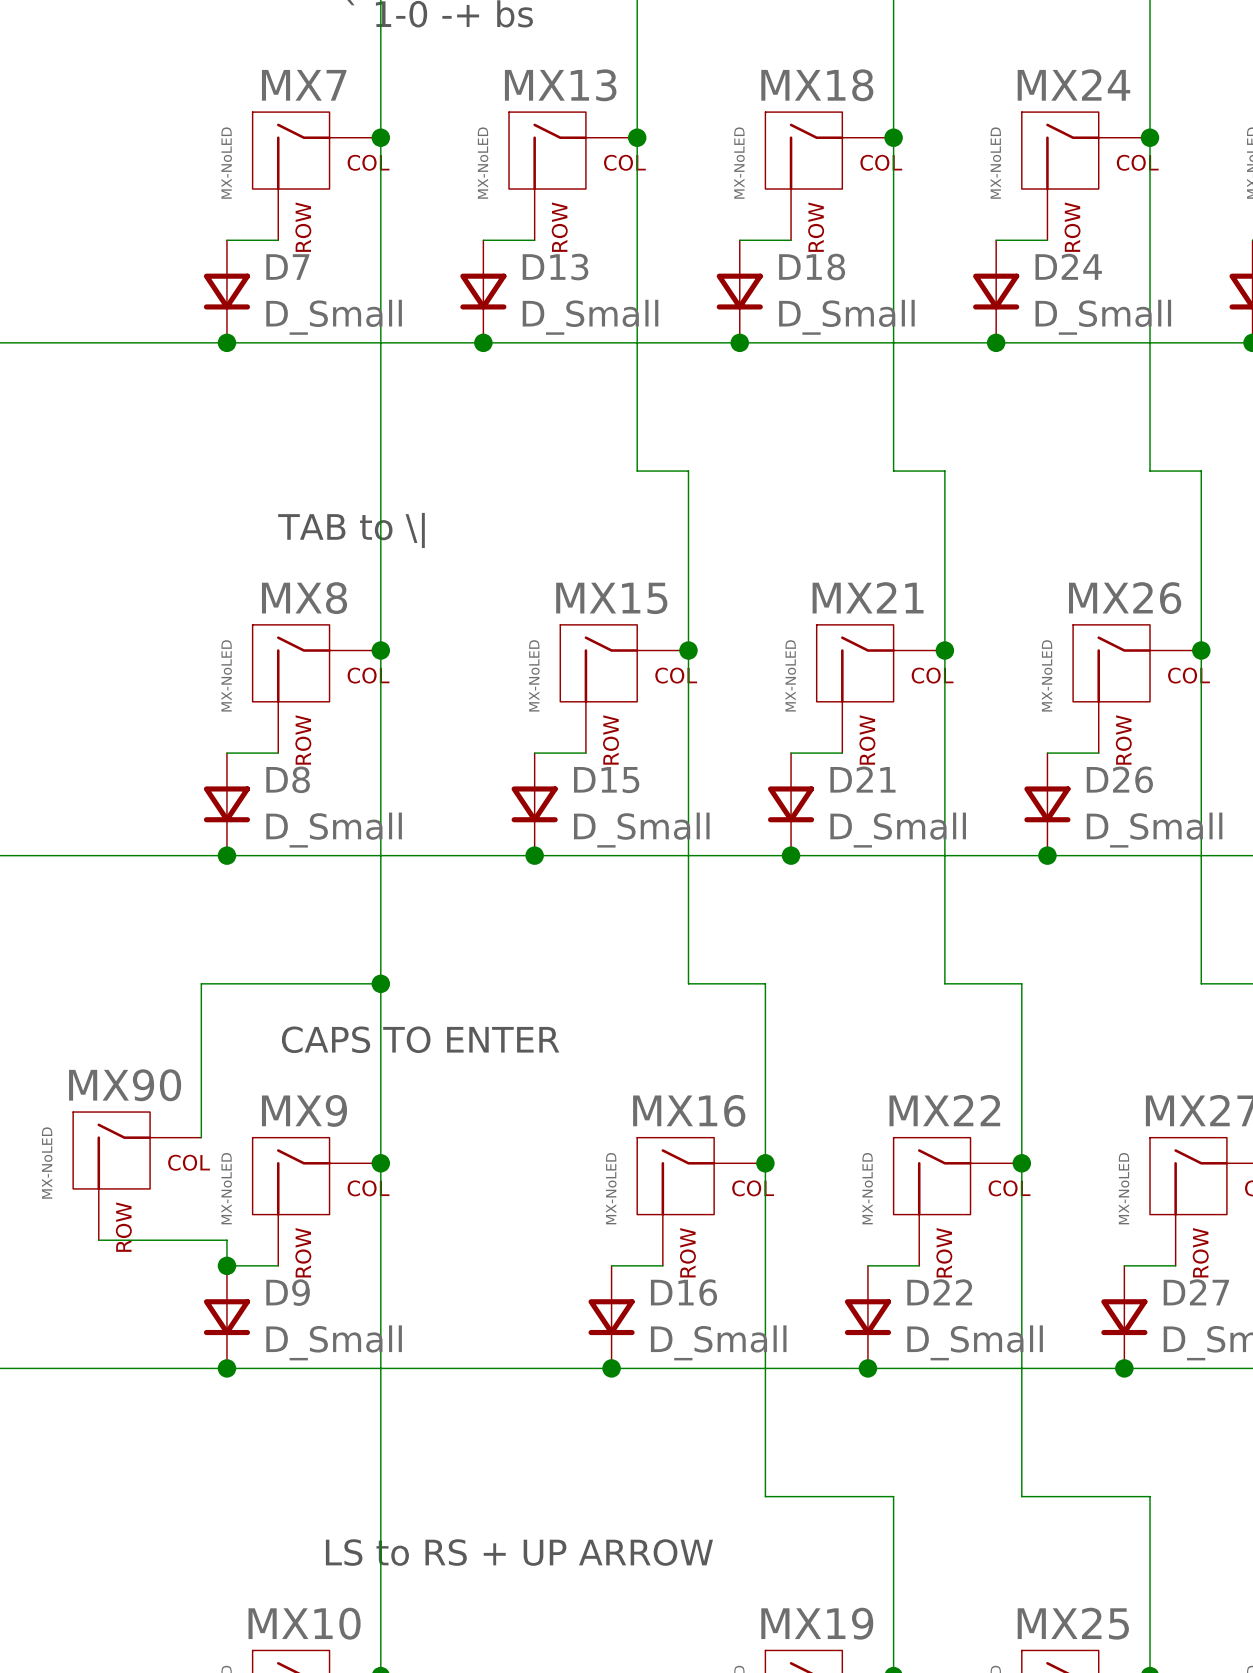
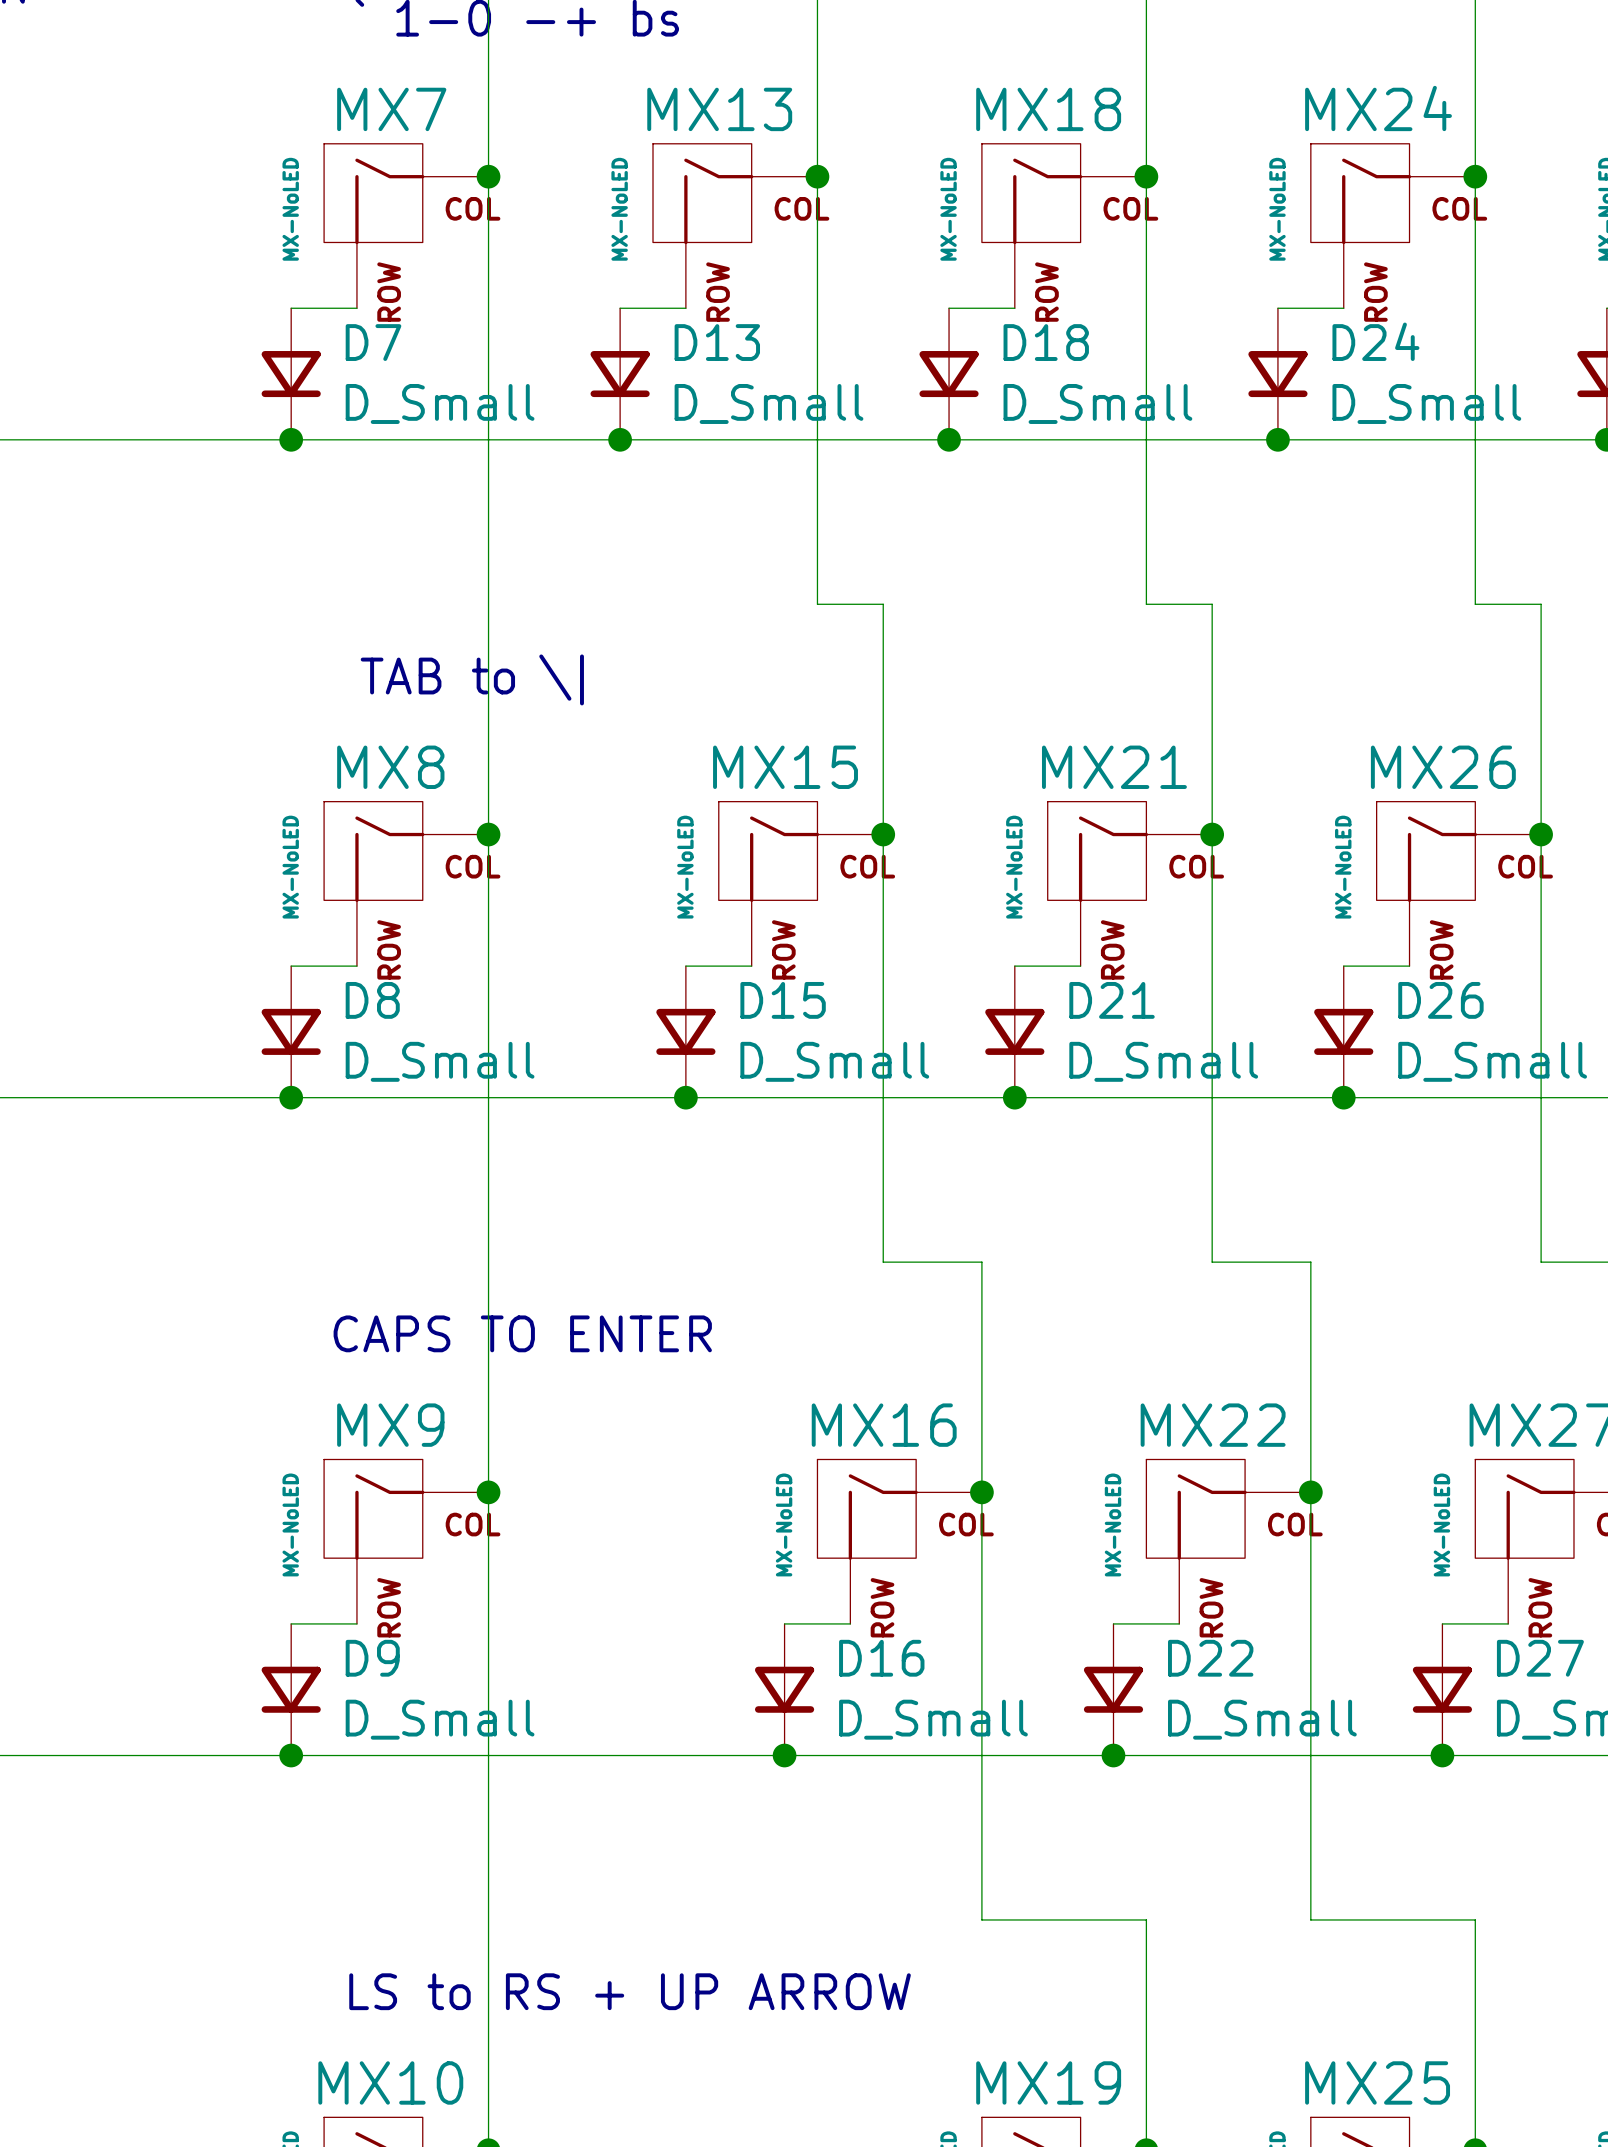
wire: (380, 983) (201, 983) (201, 1137) -> none
junction: (380, 983) -> none
MX90: MX-NoLED (137, 1176) -> none
wire: (98, 1240) (226, 1240) (226, 1265) -> none
junction: (226, 1265) -> none

